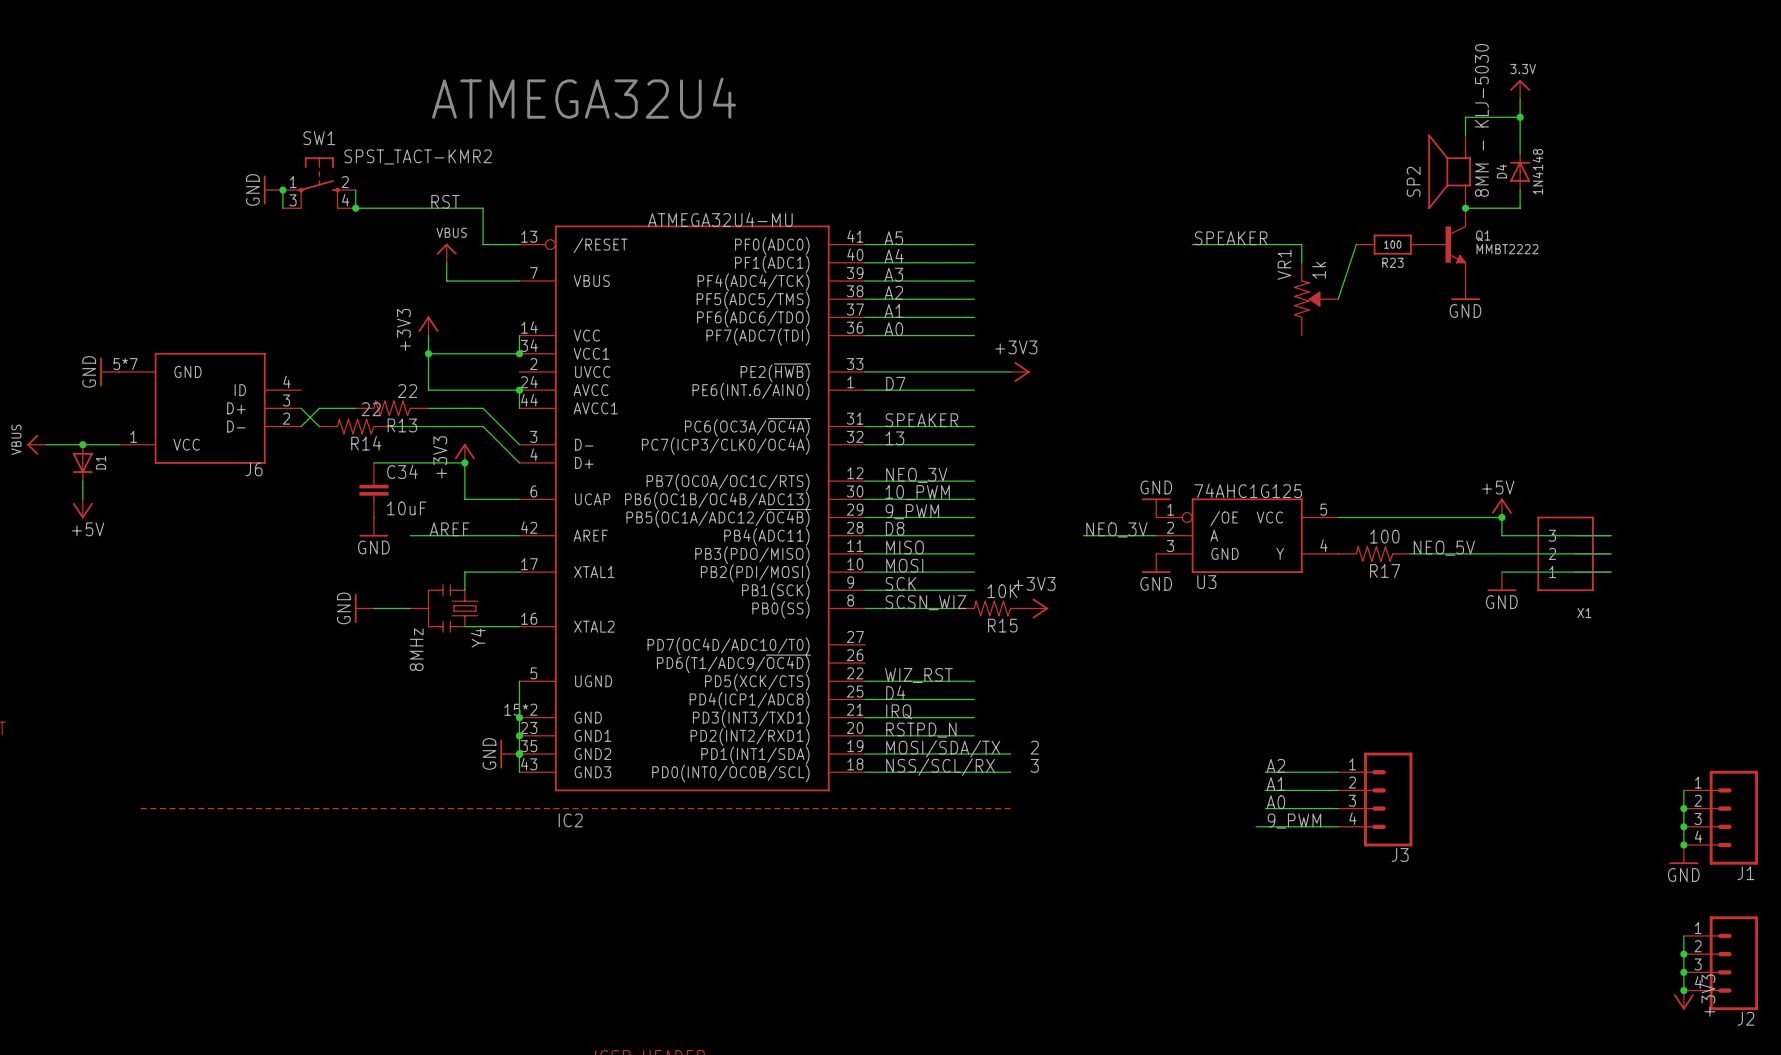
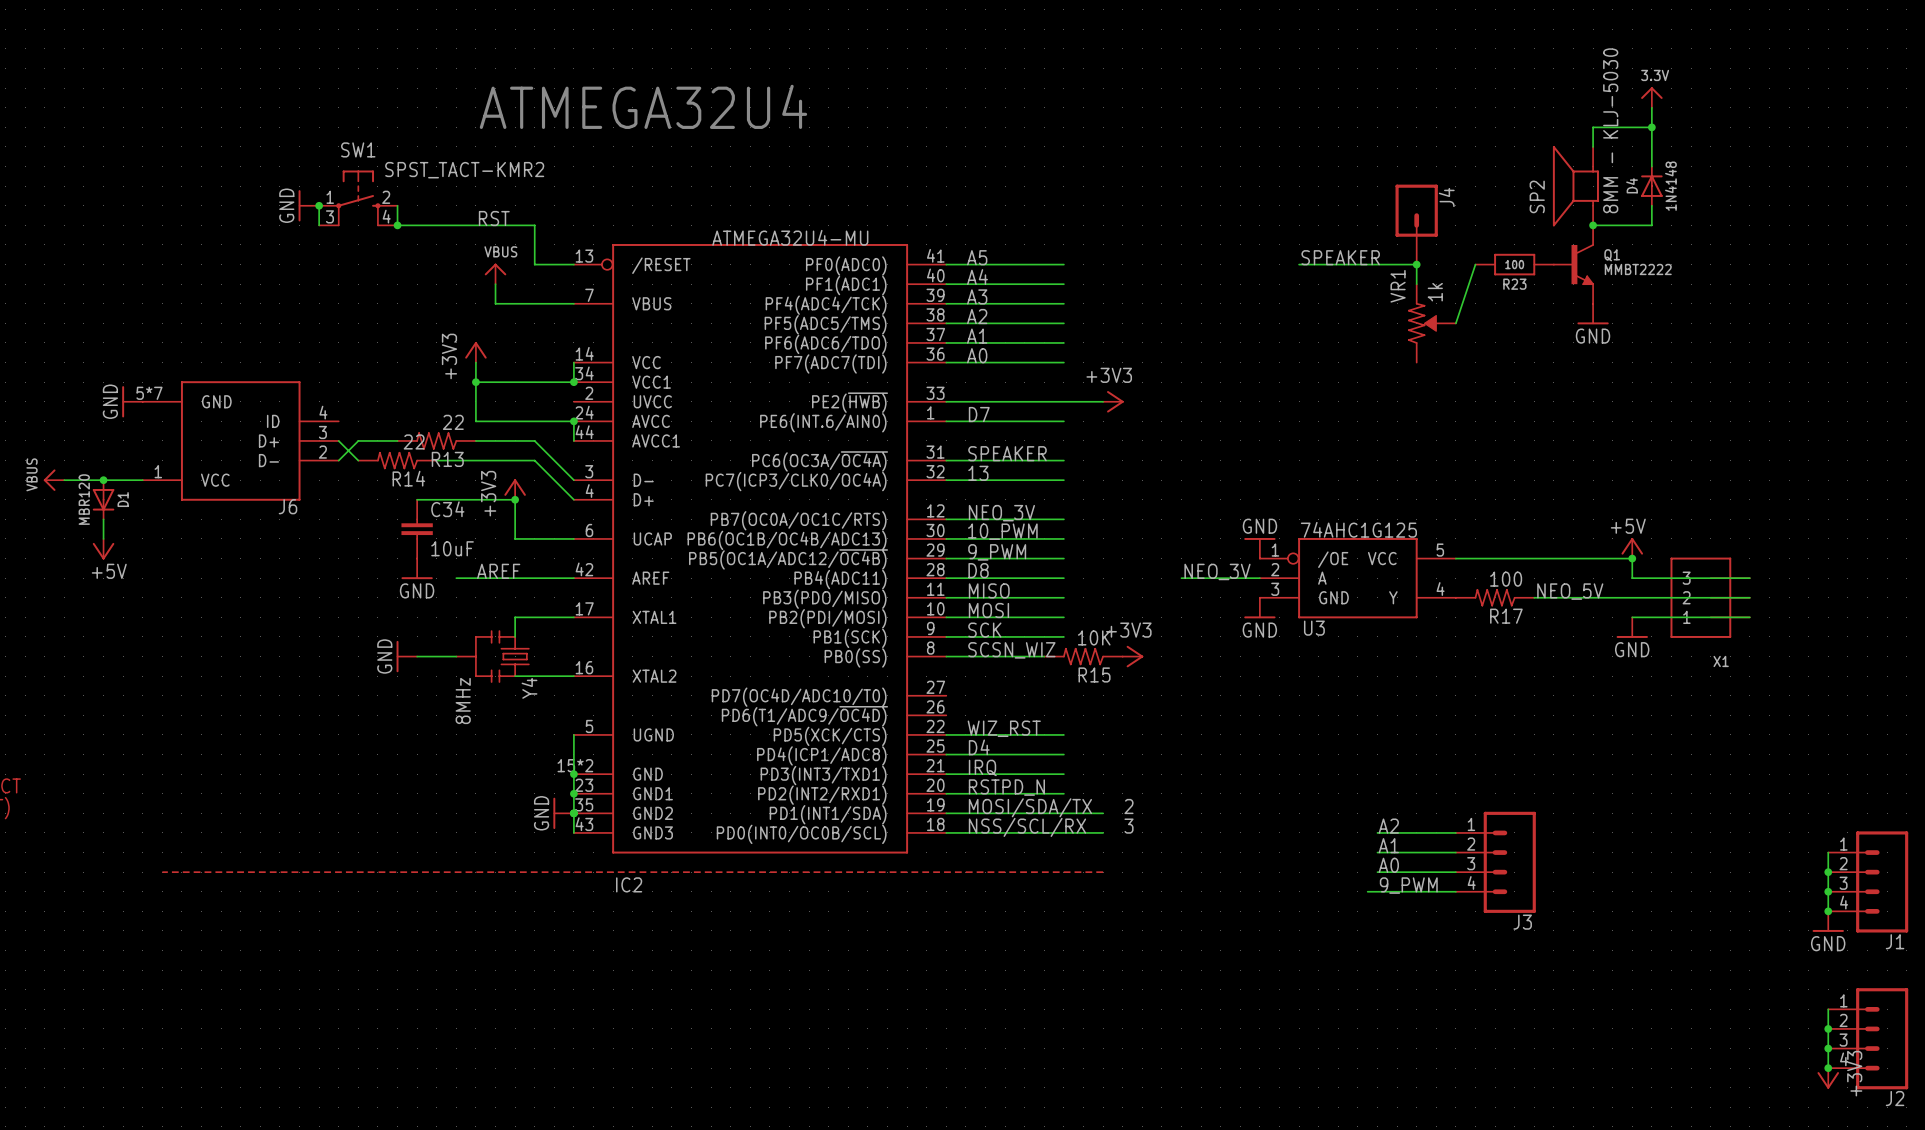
J4: none -> (1416, 224)
junction: none -> (1416, 264)
D1 value: none -> MBR120 (84, 499)

